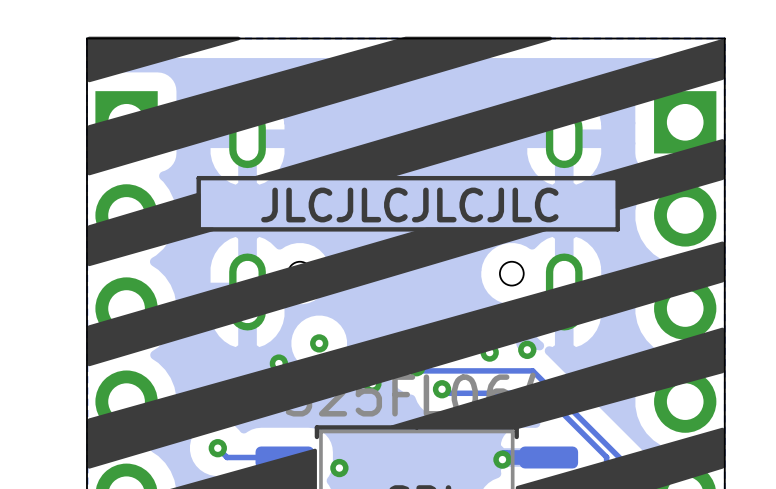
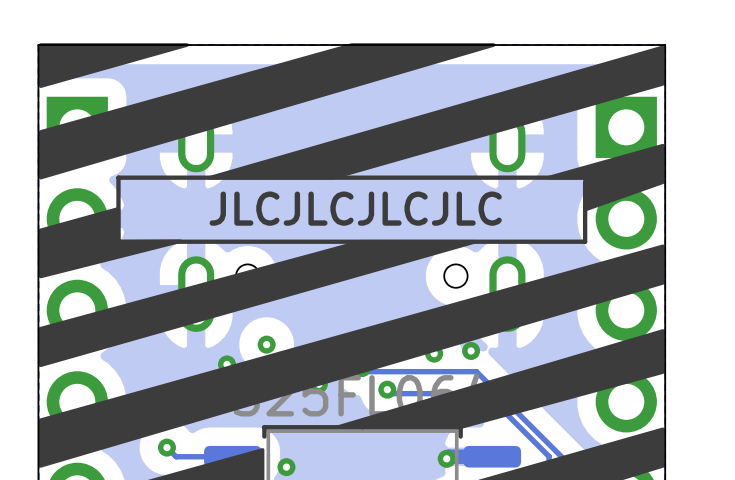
drawing shape: [252, 39, 725, 181] -> [208, 45, 665, 180]
drawing shape: [590, 139, 725, 211] -> [546, 143, 665, 212]
line: none -> (585, 177) (118, 177) (118, 241) (585, 241) (585, 182)
line: (617, 178) (617, 229) (198, 229) (198, 178) (617, 178) -> none
drawing shape: [87, 192, 215, 267] -> [38, 206, 183, 279]
drawing shape: [87, 227, 548, 367] -> [38, 239, 478, 368]

